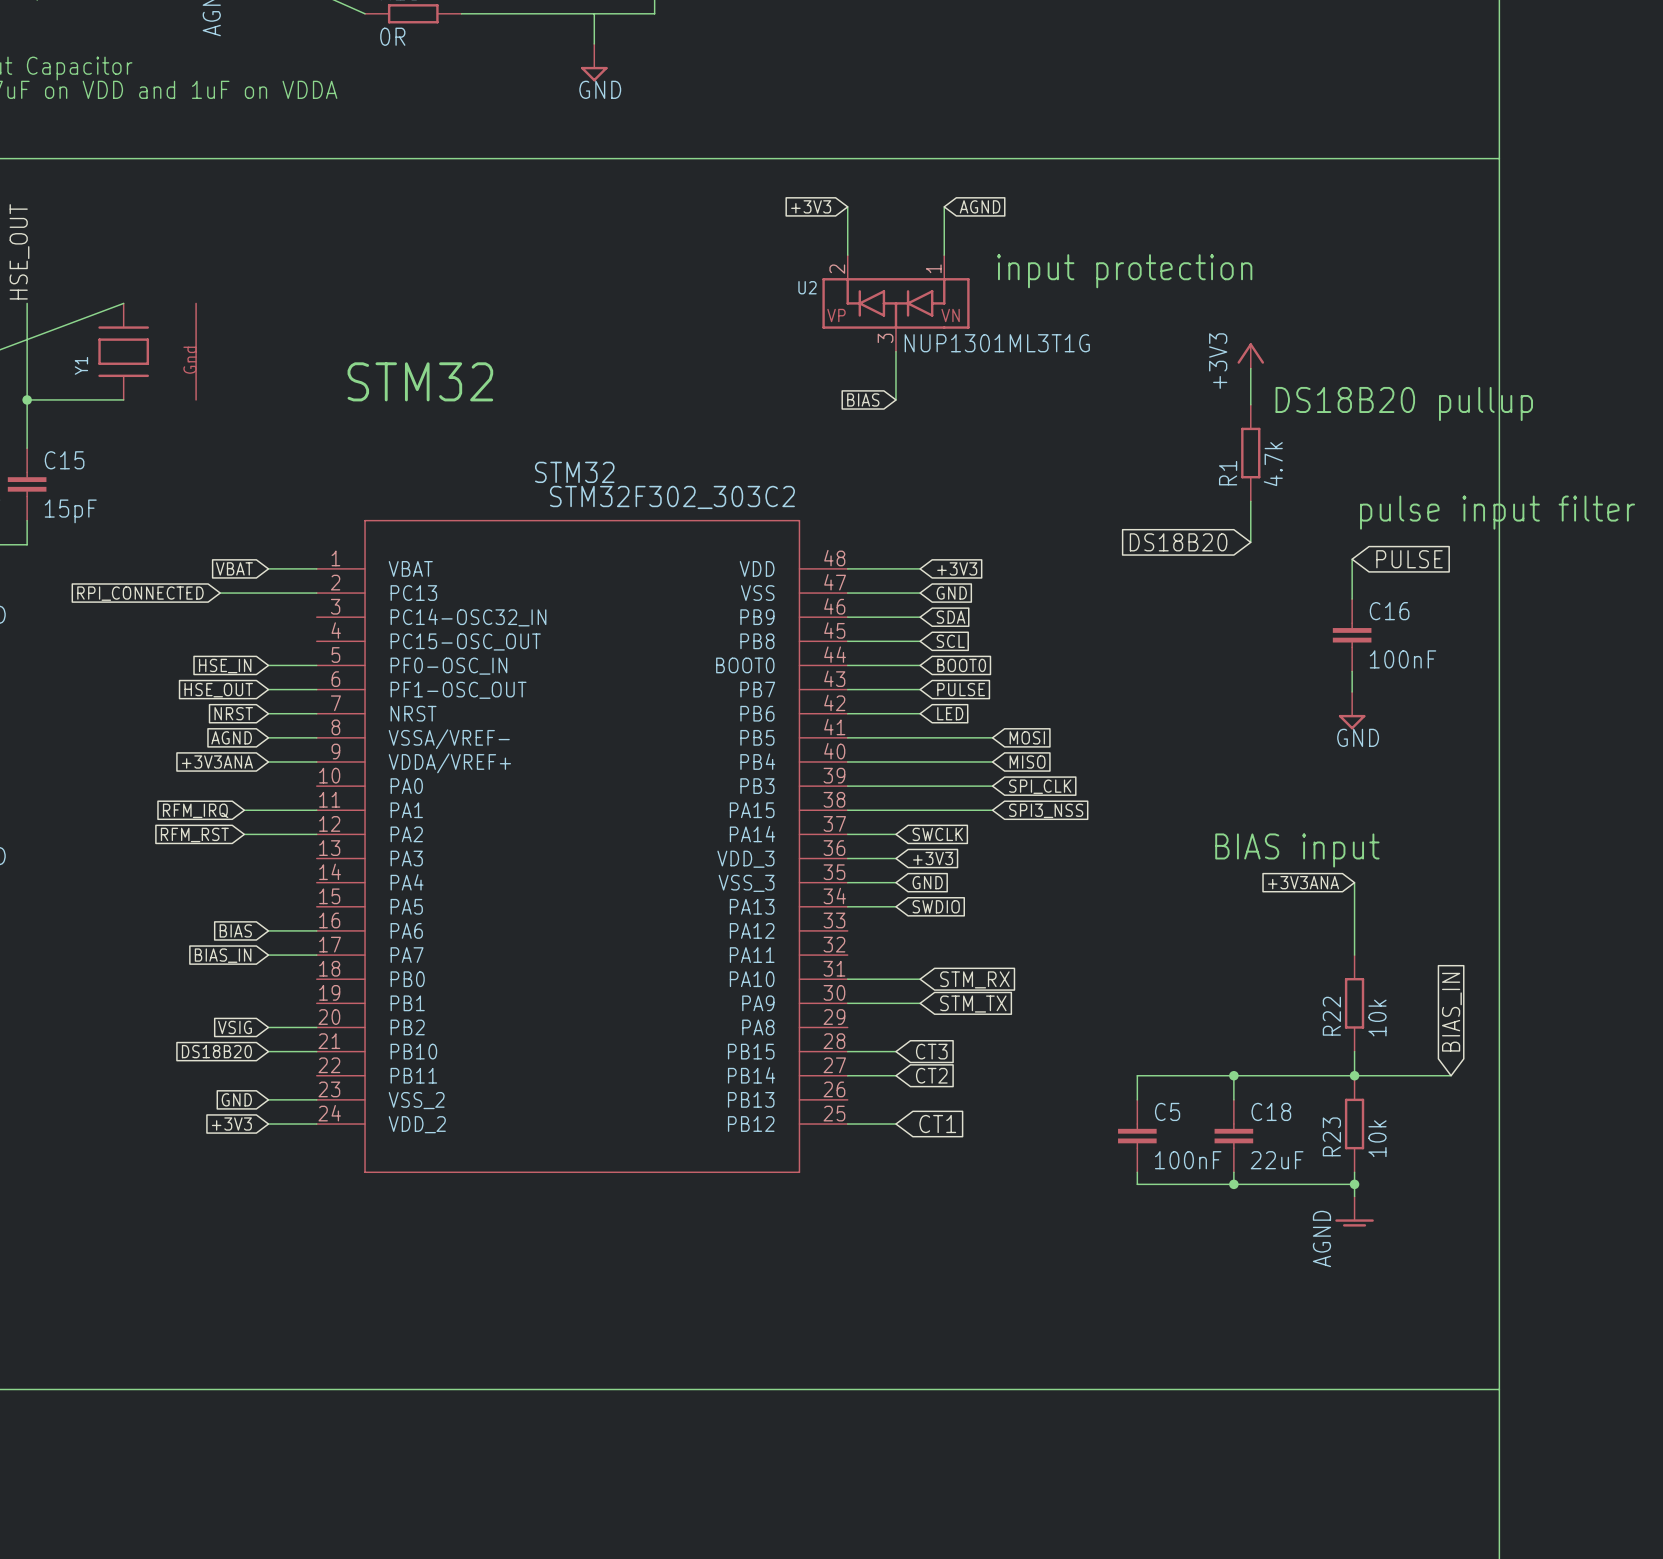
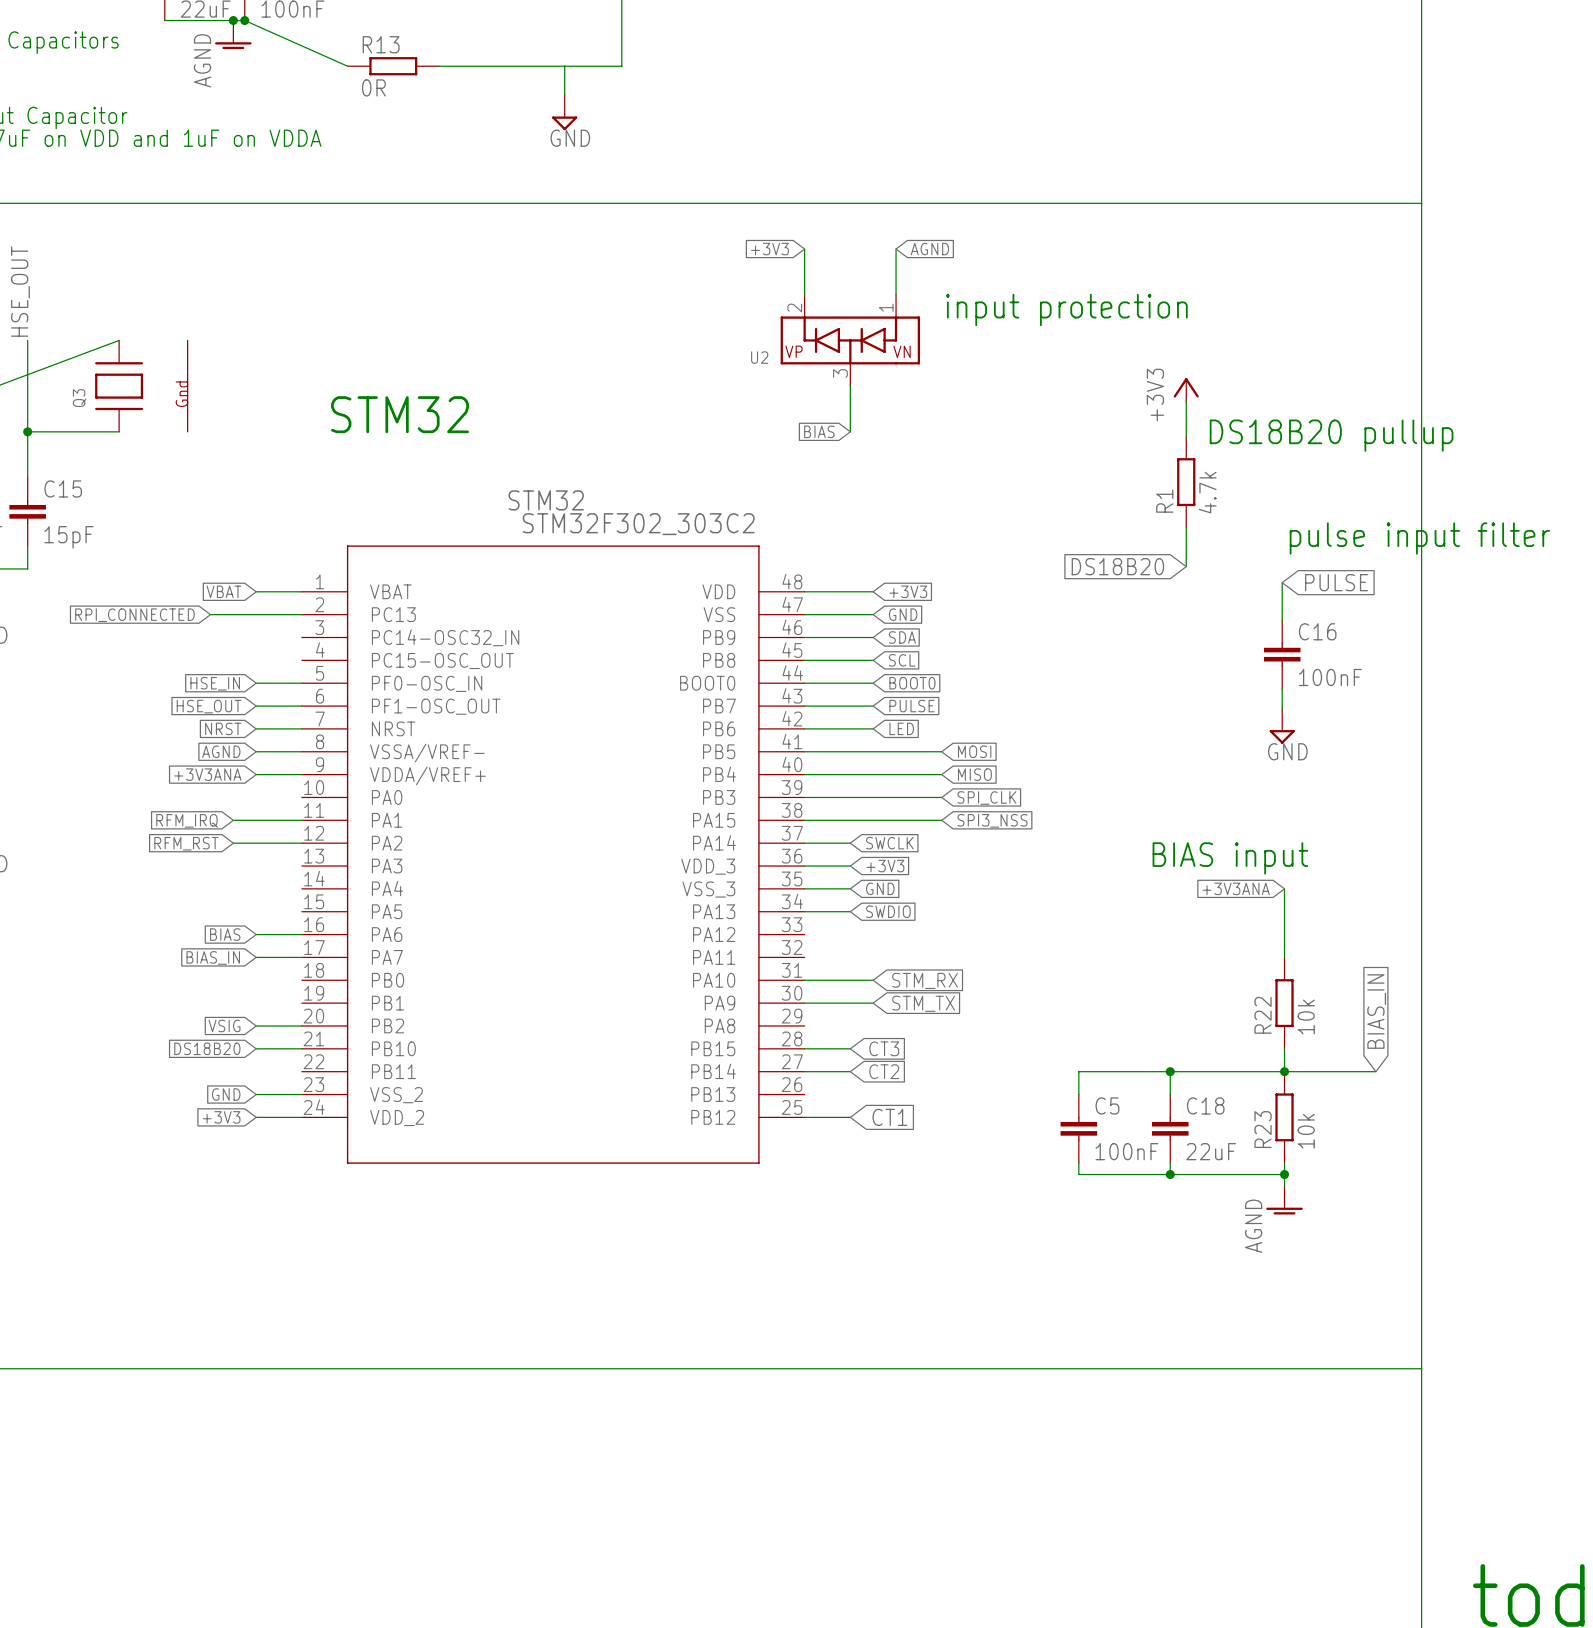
U2 name position: U2 (807, 287) -> U2 (759, 357)
U2 text: NUP1301ML3T1G (997, 343) -> none
Y1 name: Y1 (81, 365) -> Q3 (79, 398)

